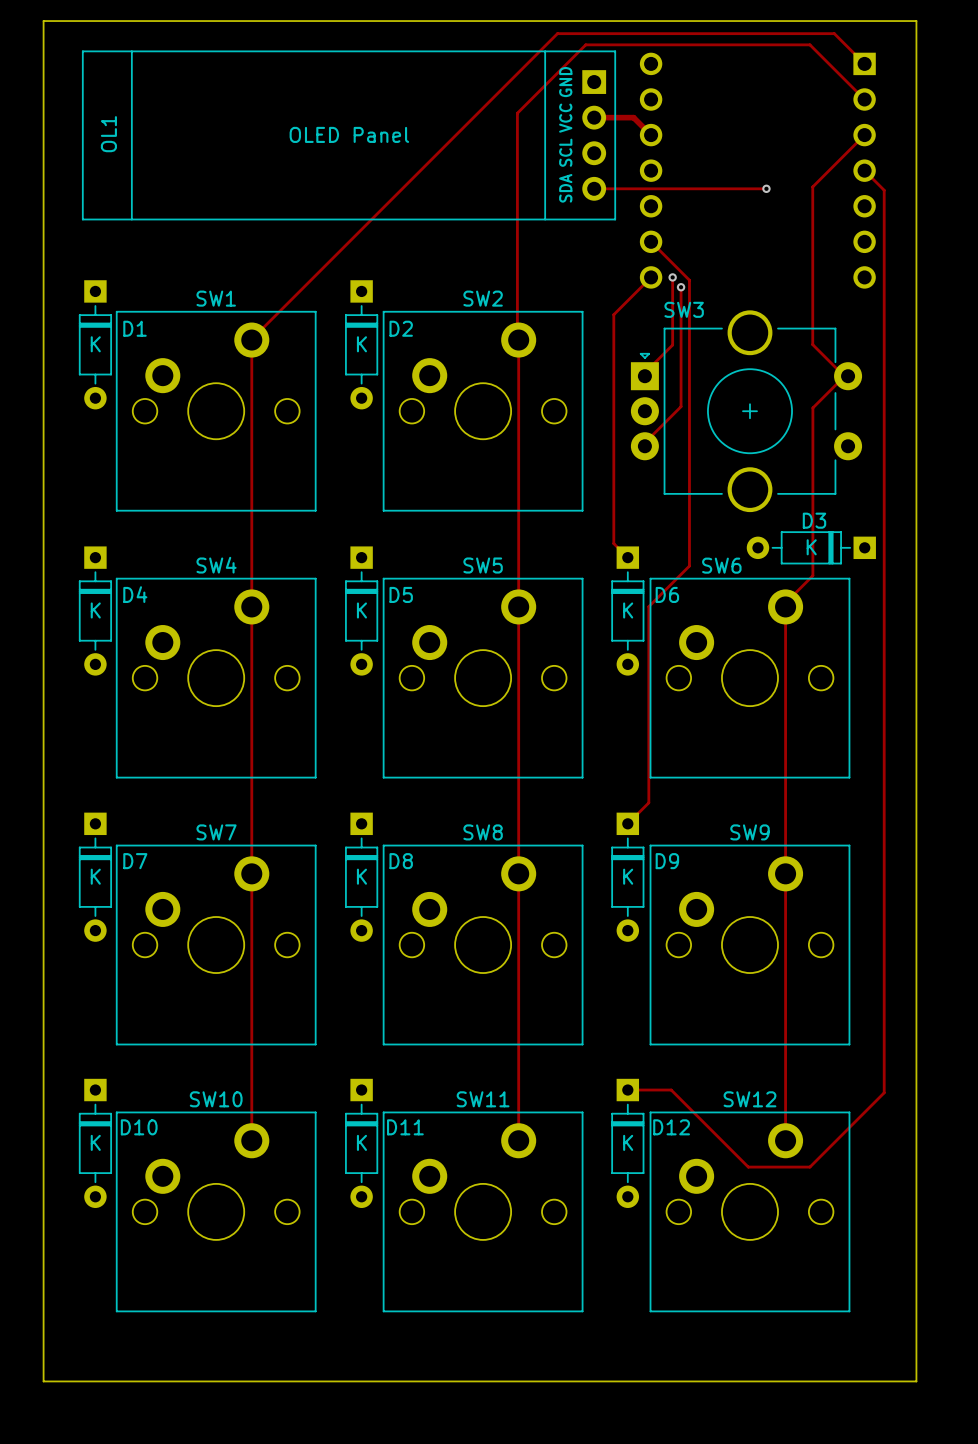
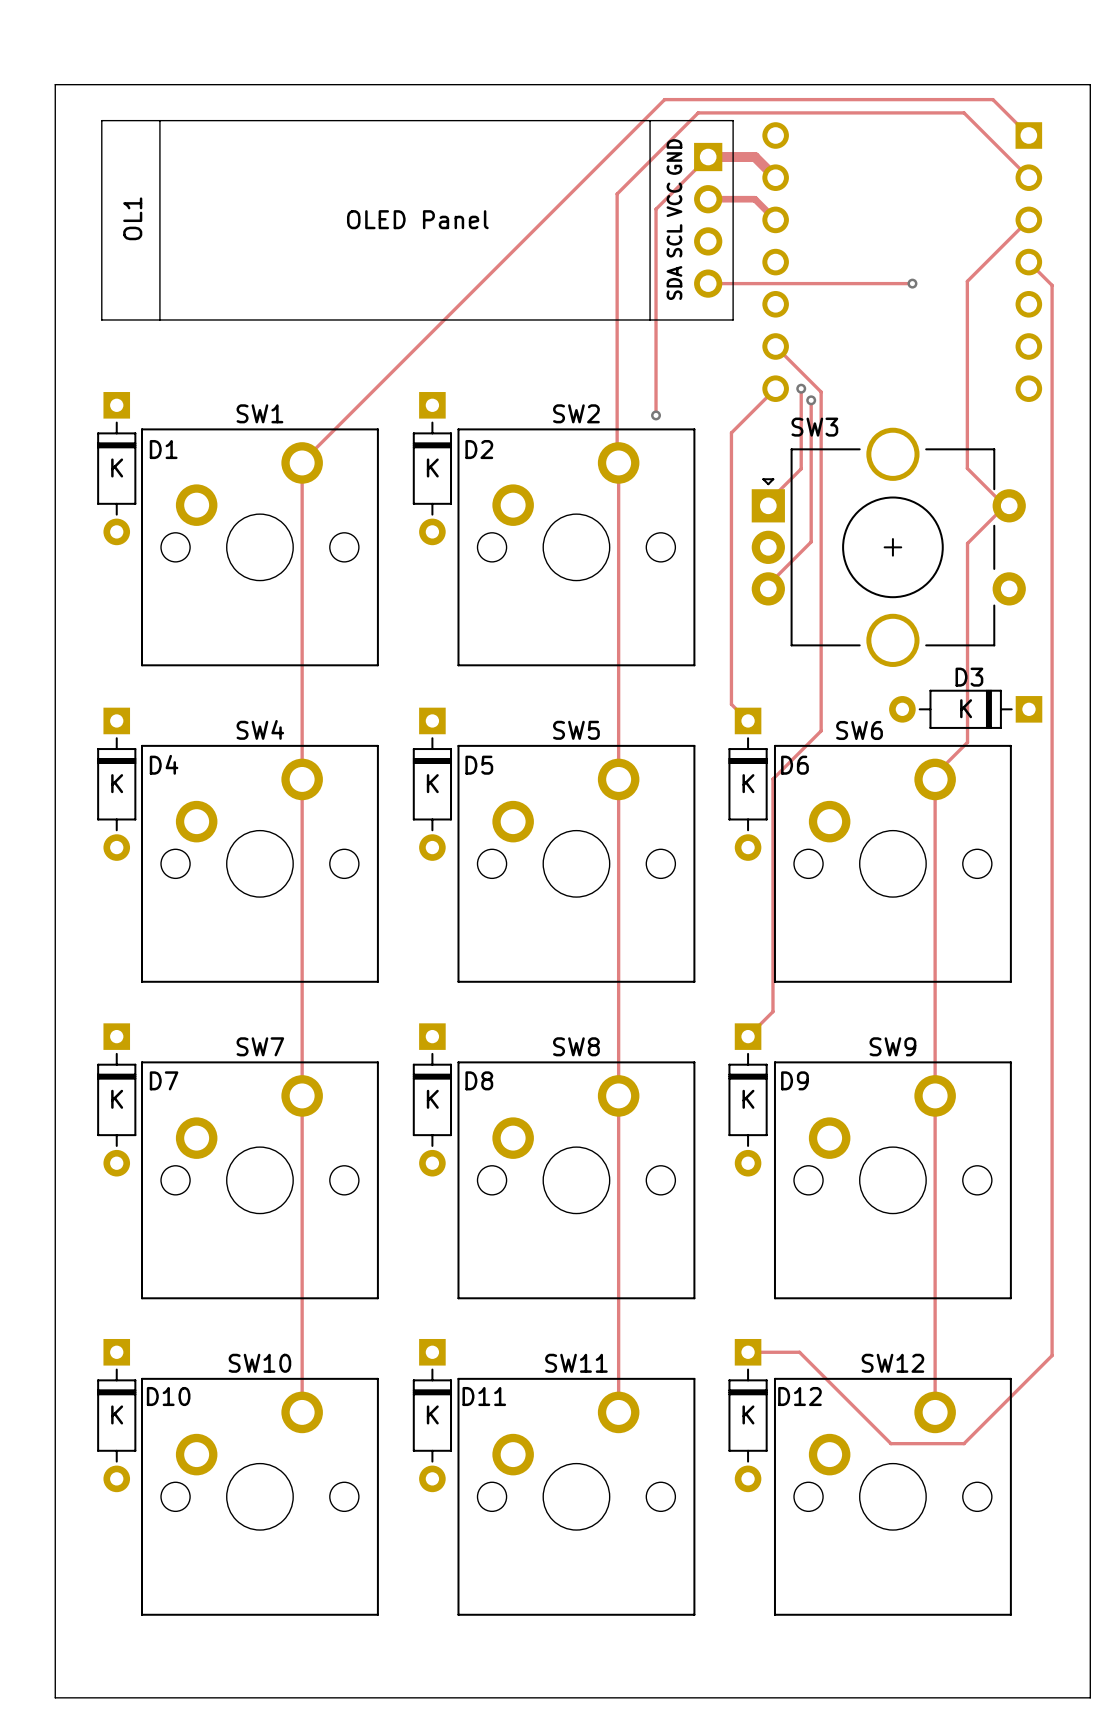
track: none -> (775, 177) (754, 157) (708, 157) (656, 209) (656, 415)
via: none -> (656, 415)

